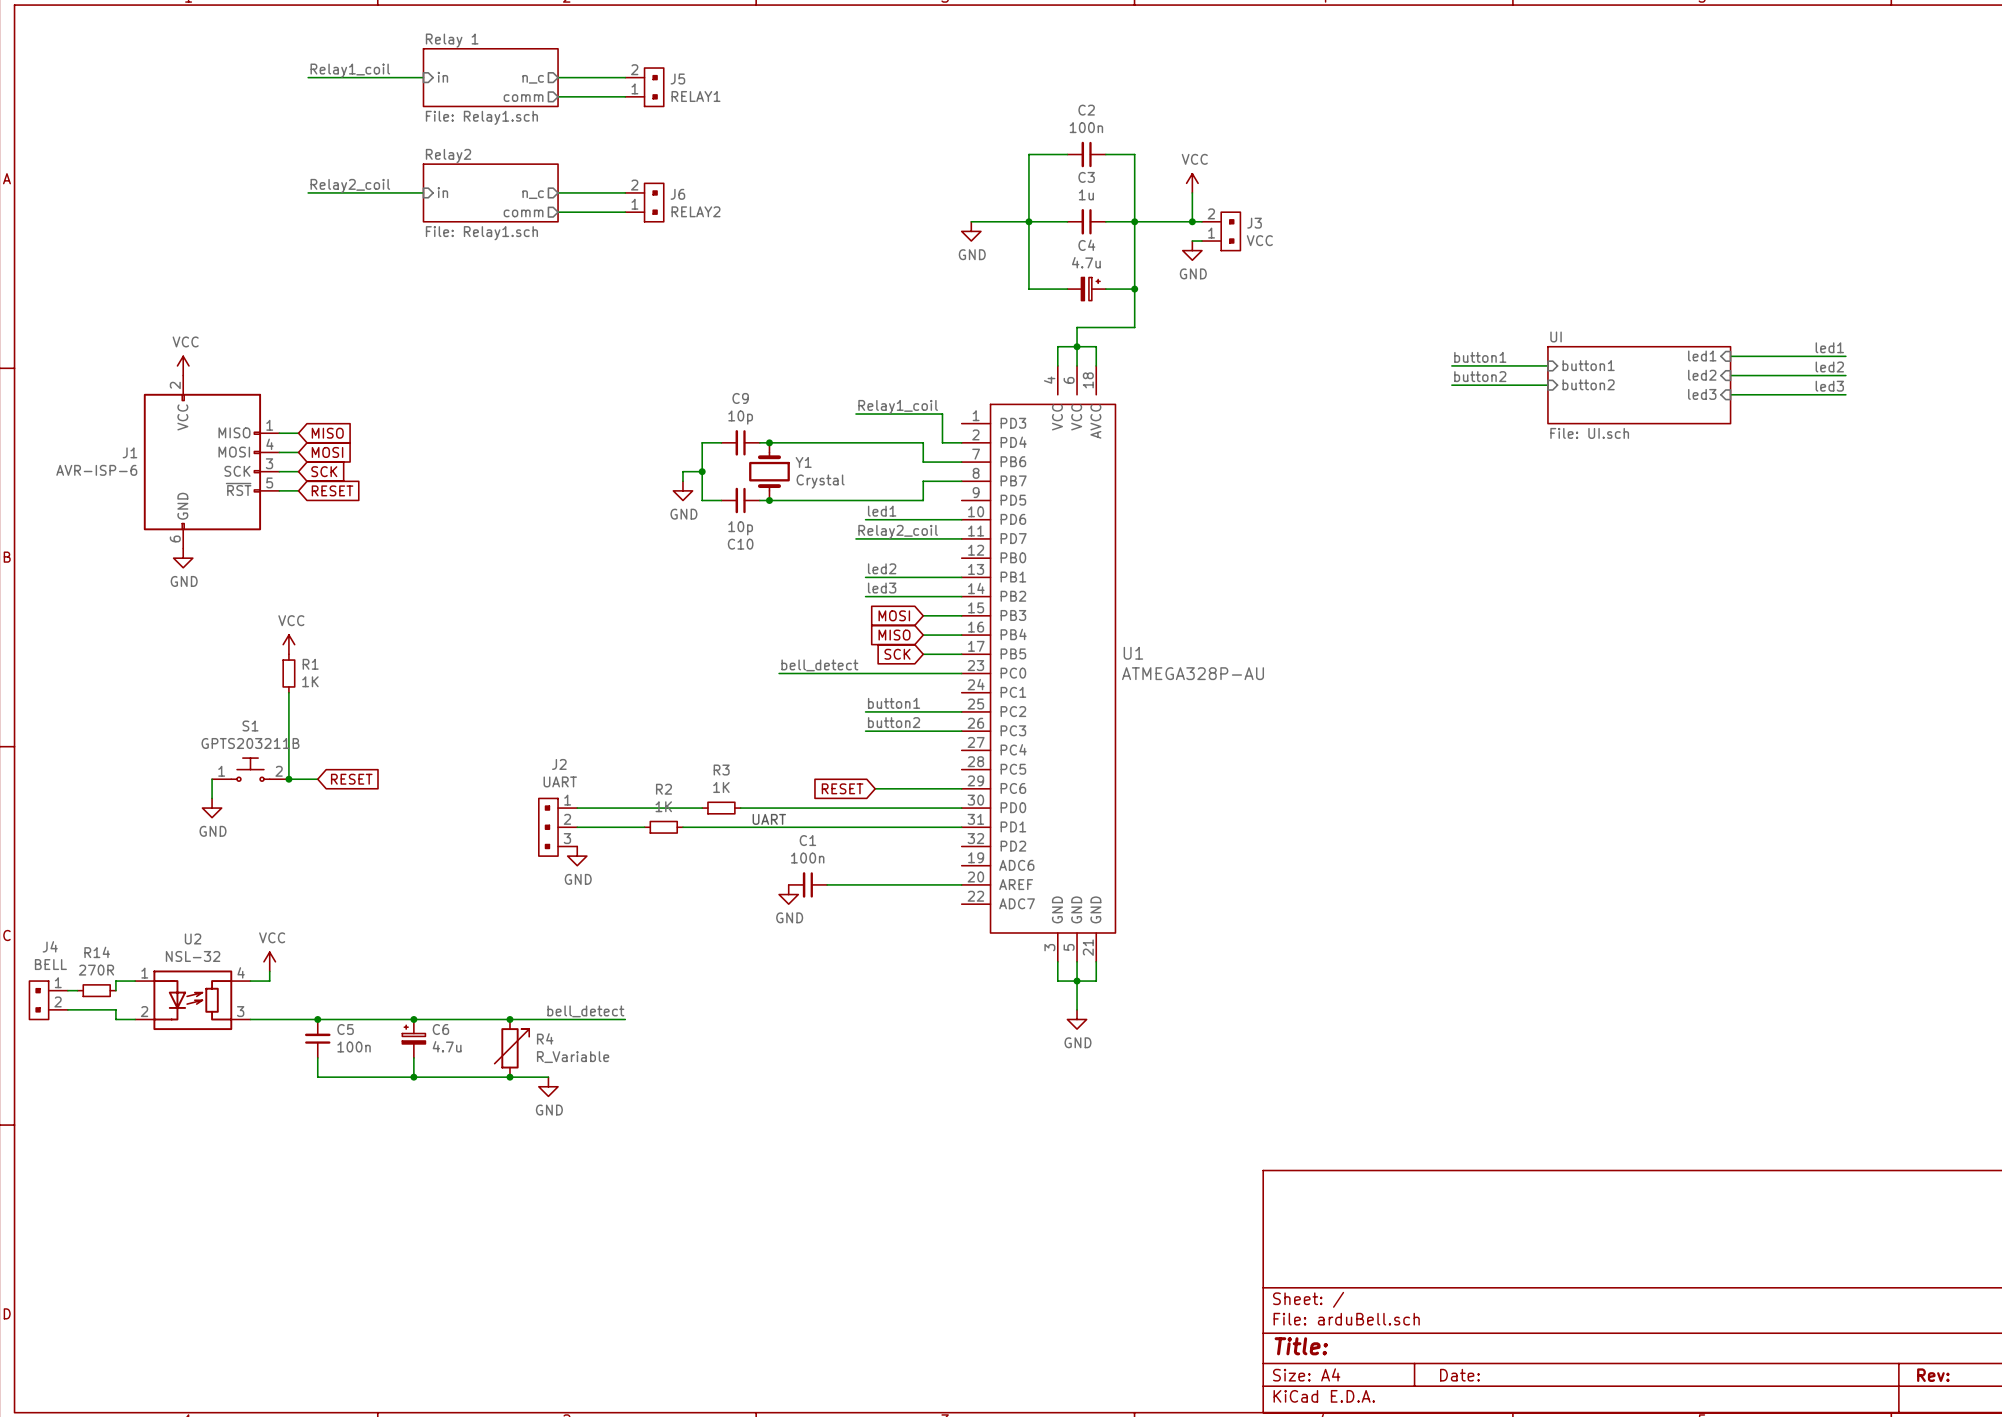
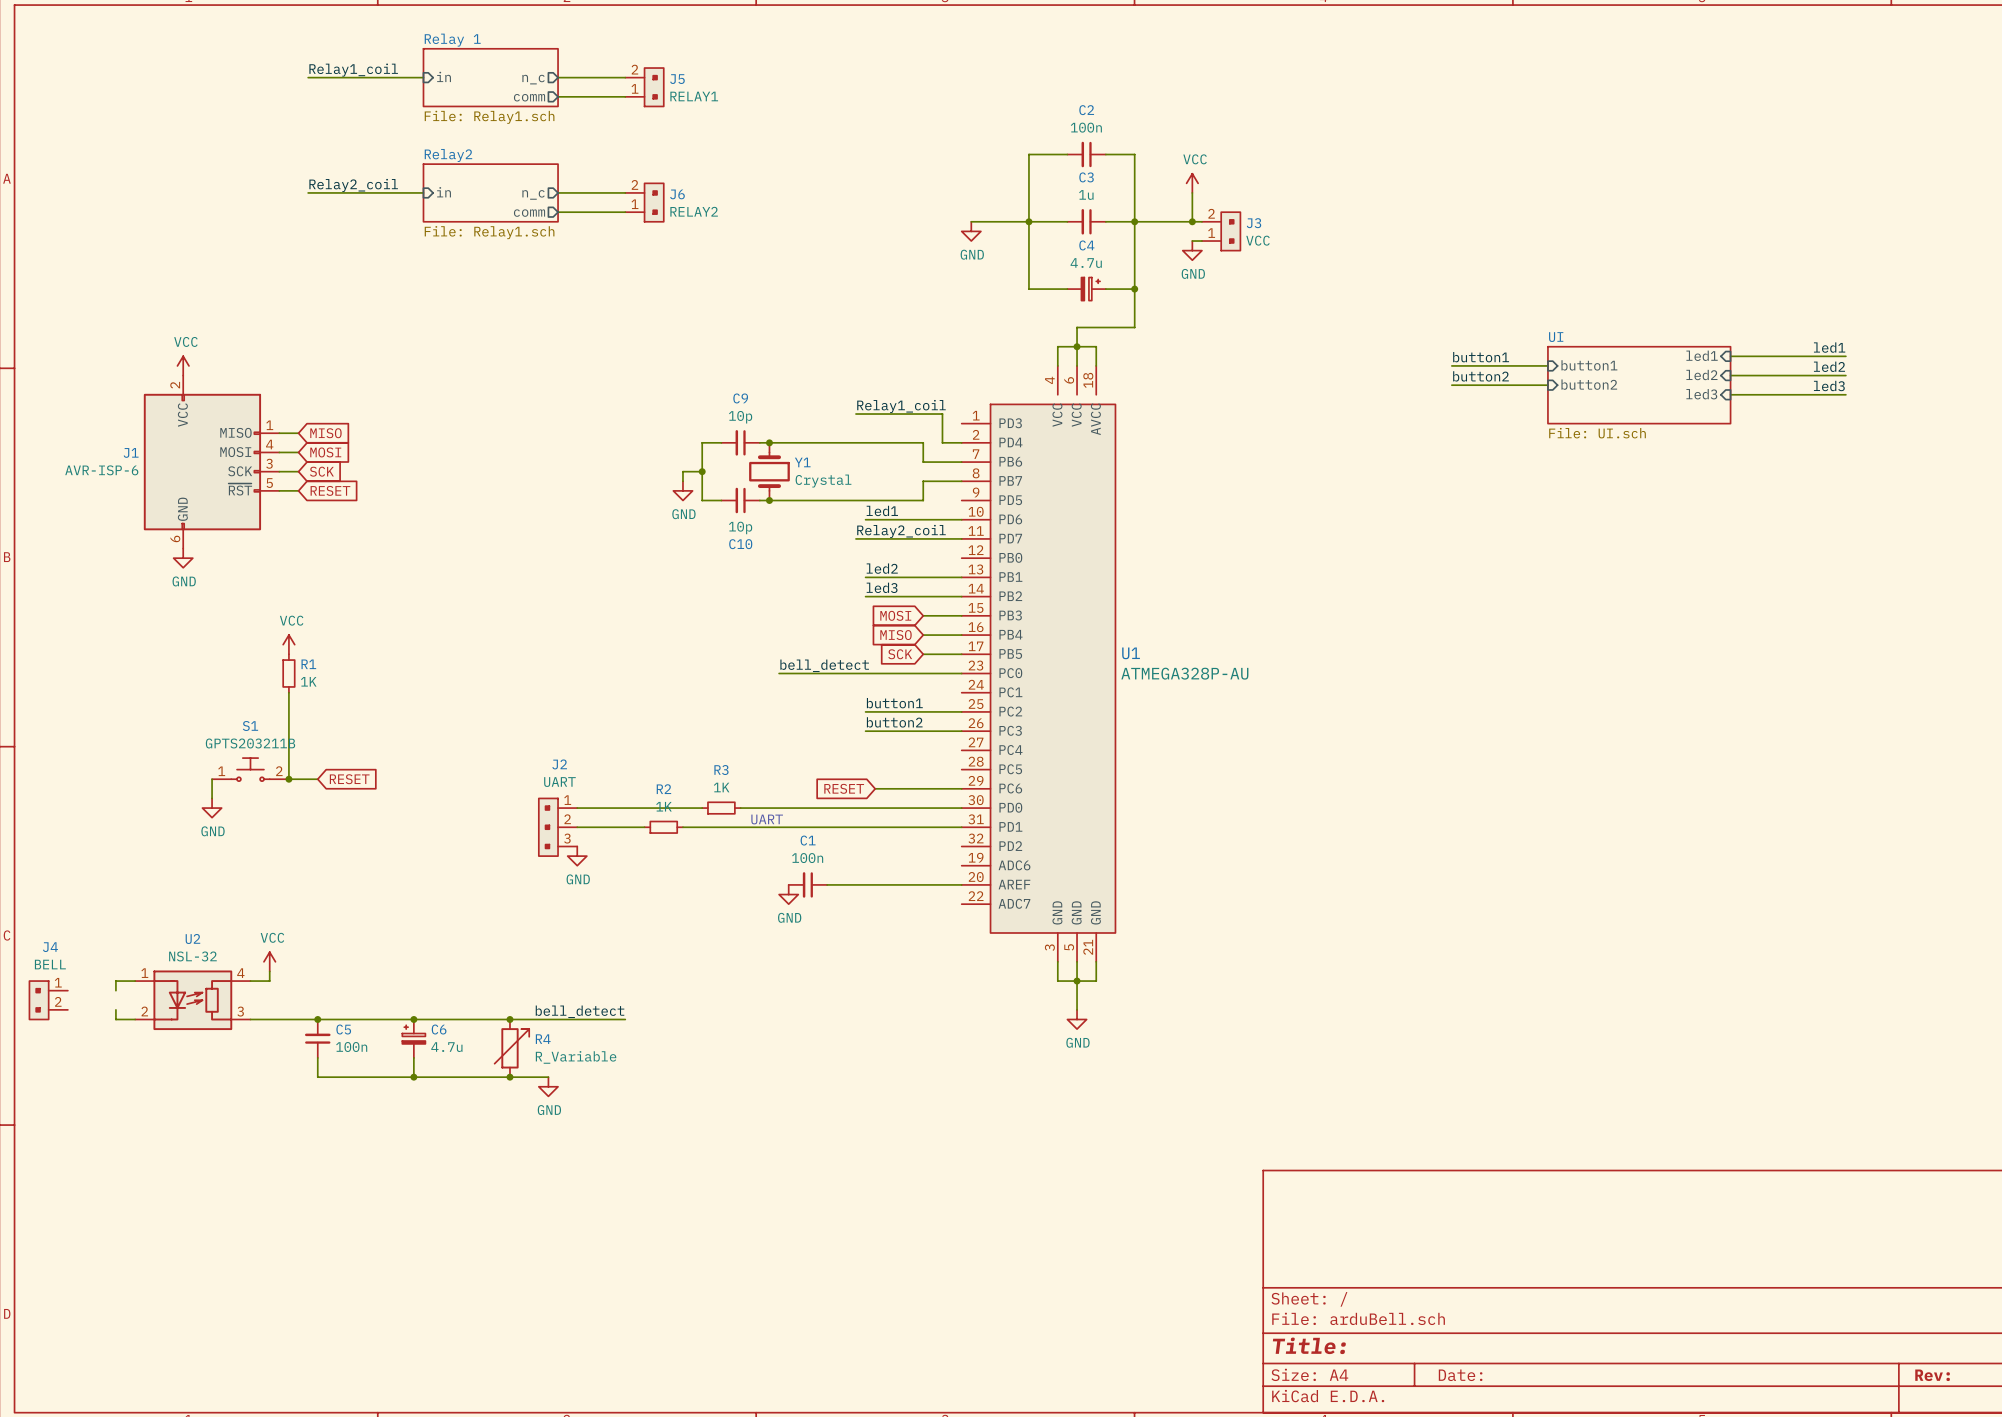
wire: (67, 990) (77, 990) -> none
R14: 270R (96, 990) -> none
wire: (67, 1009) (115, 1009) -> none

